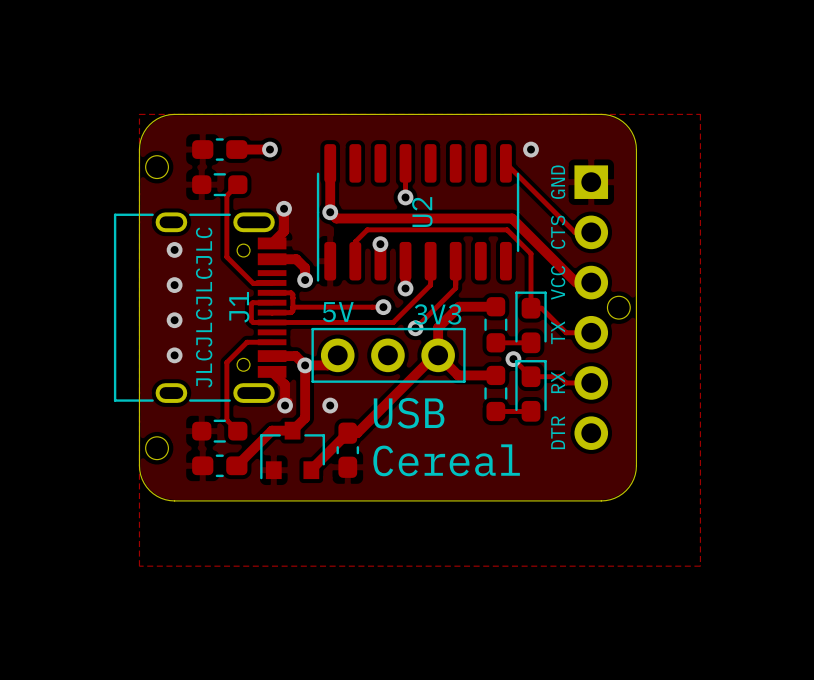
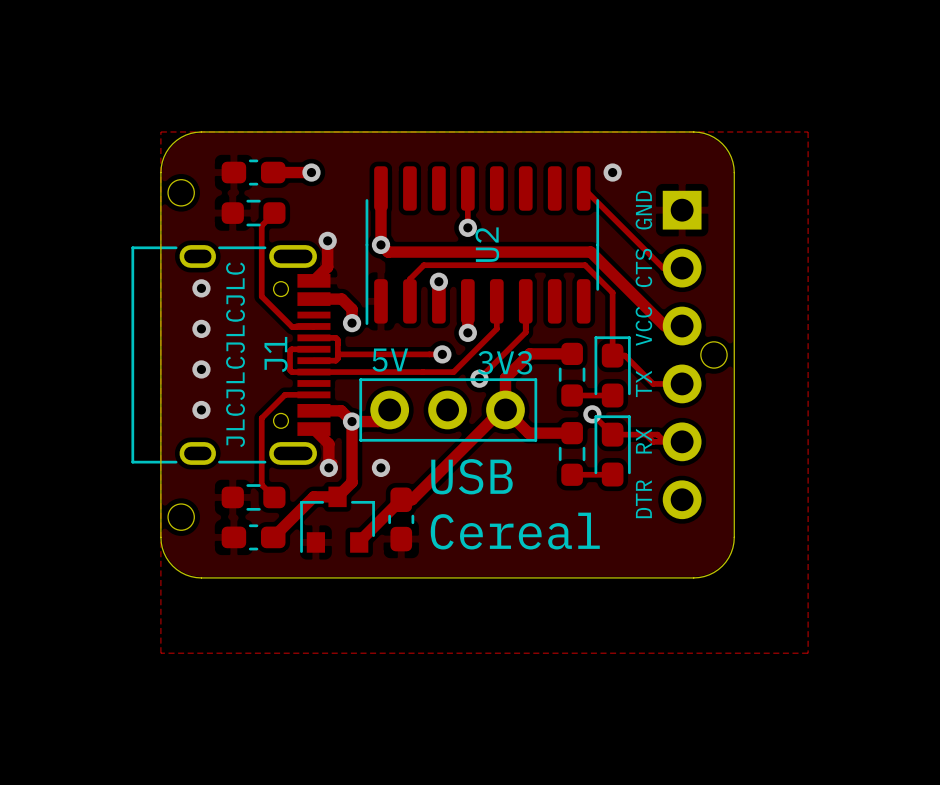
track: none -> (645, 434) (657, 434) (664, 441)

